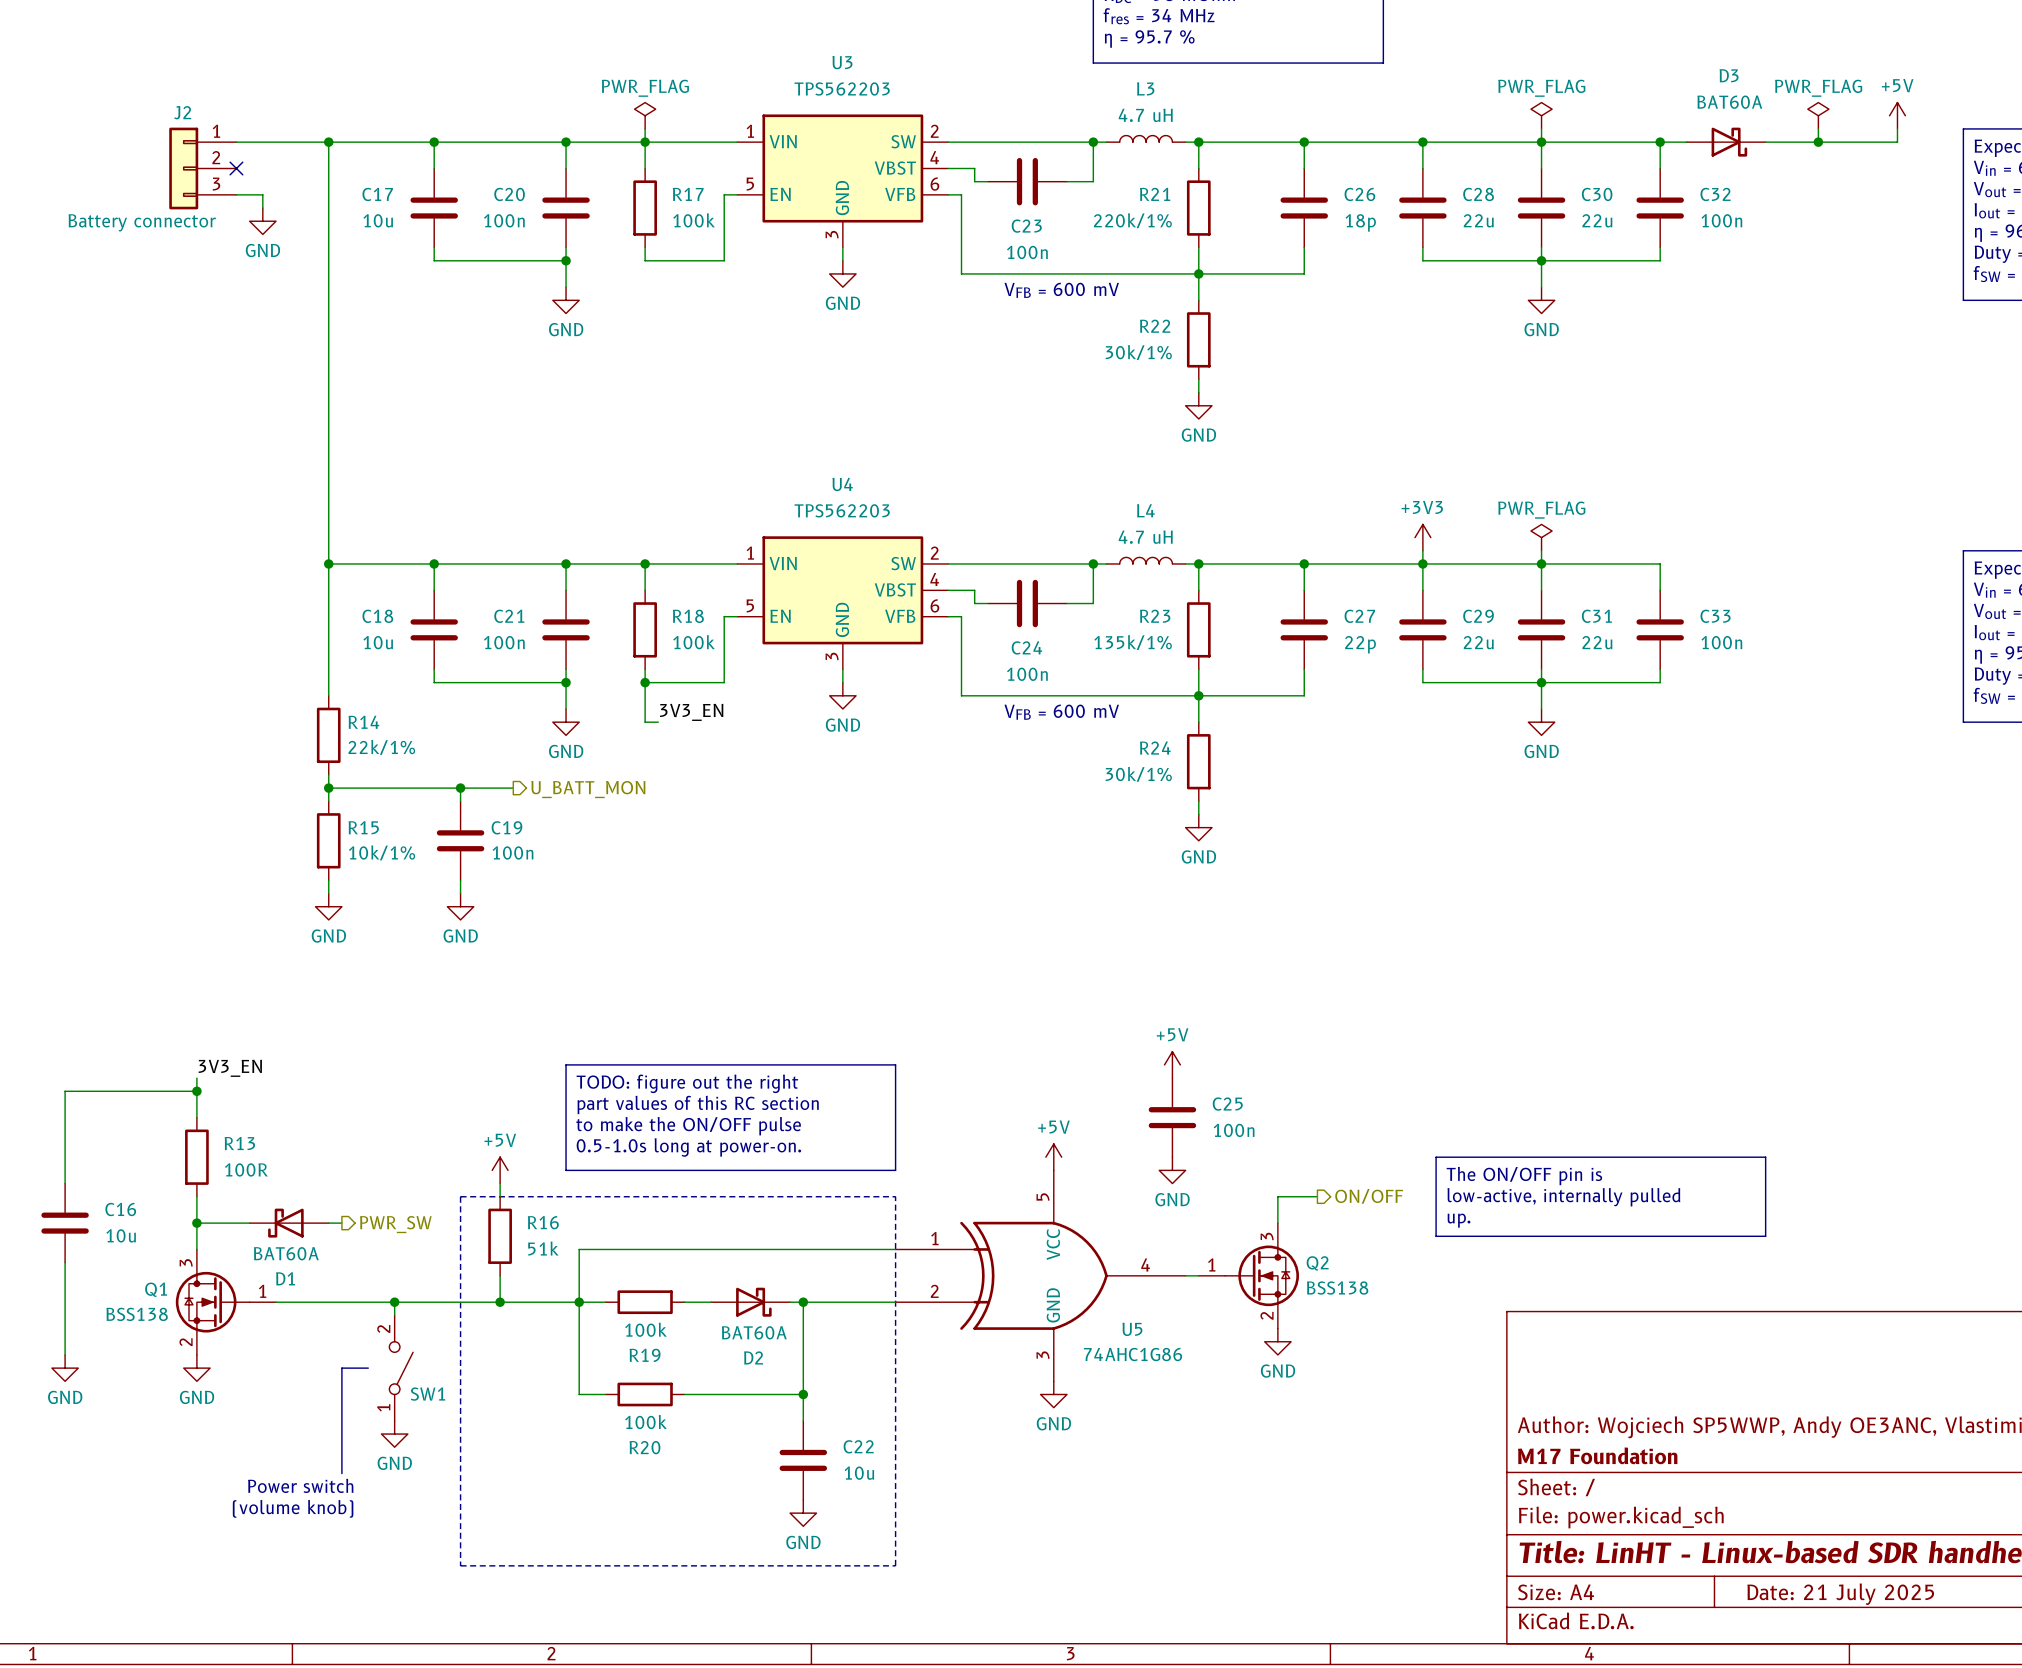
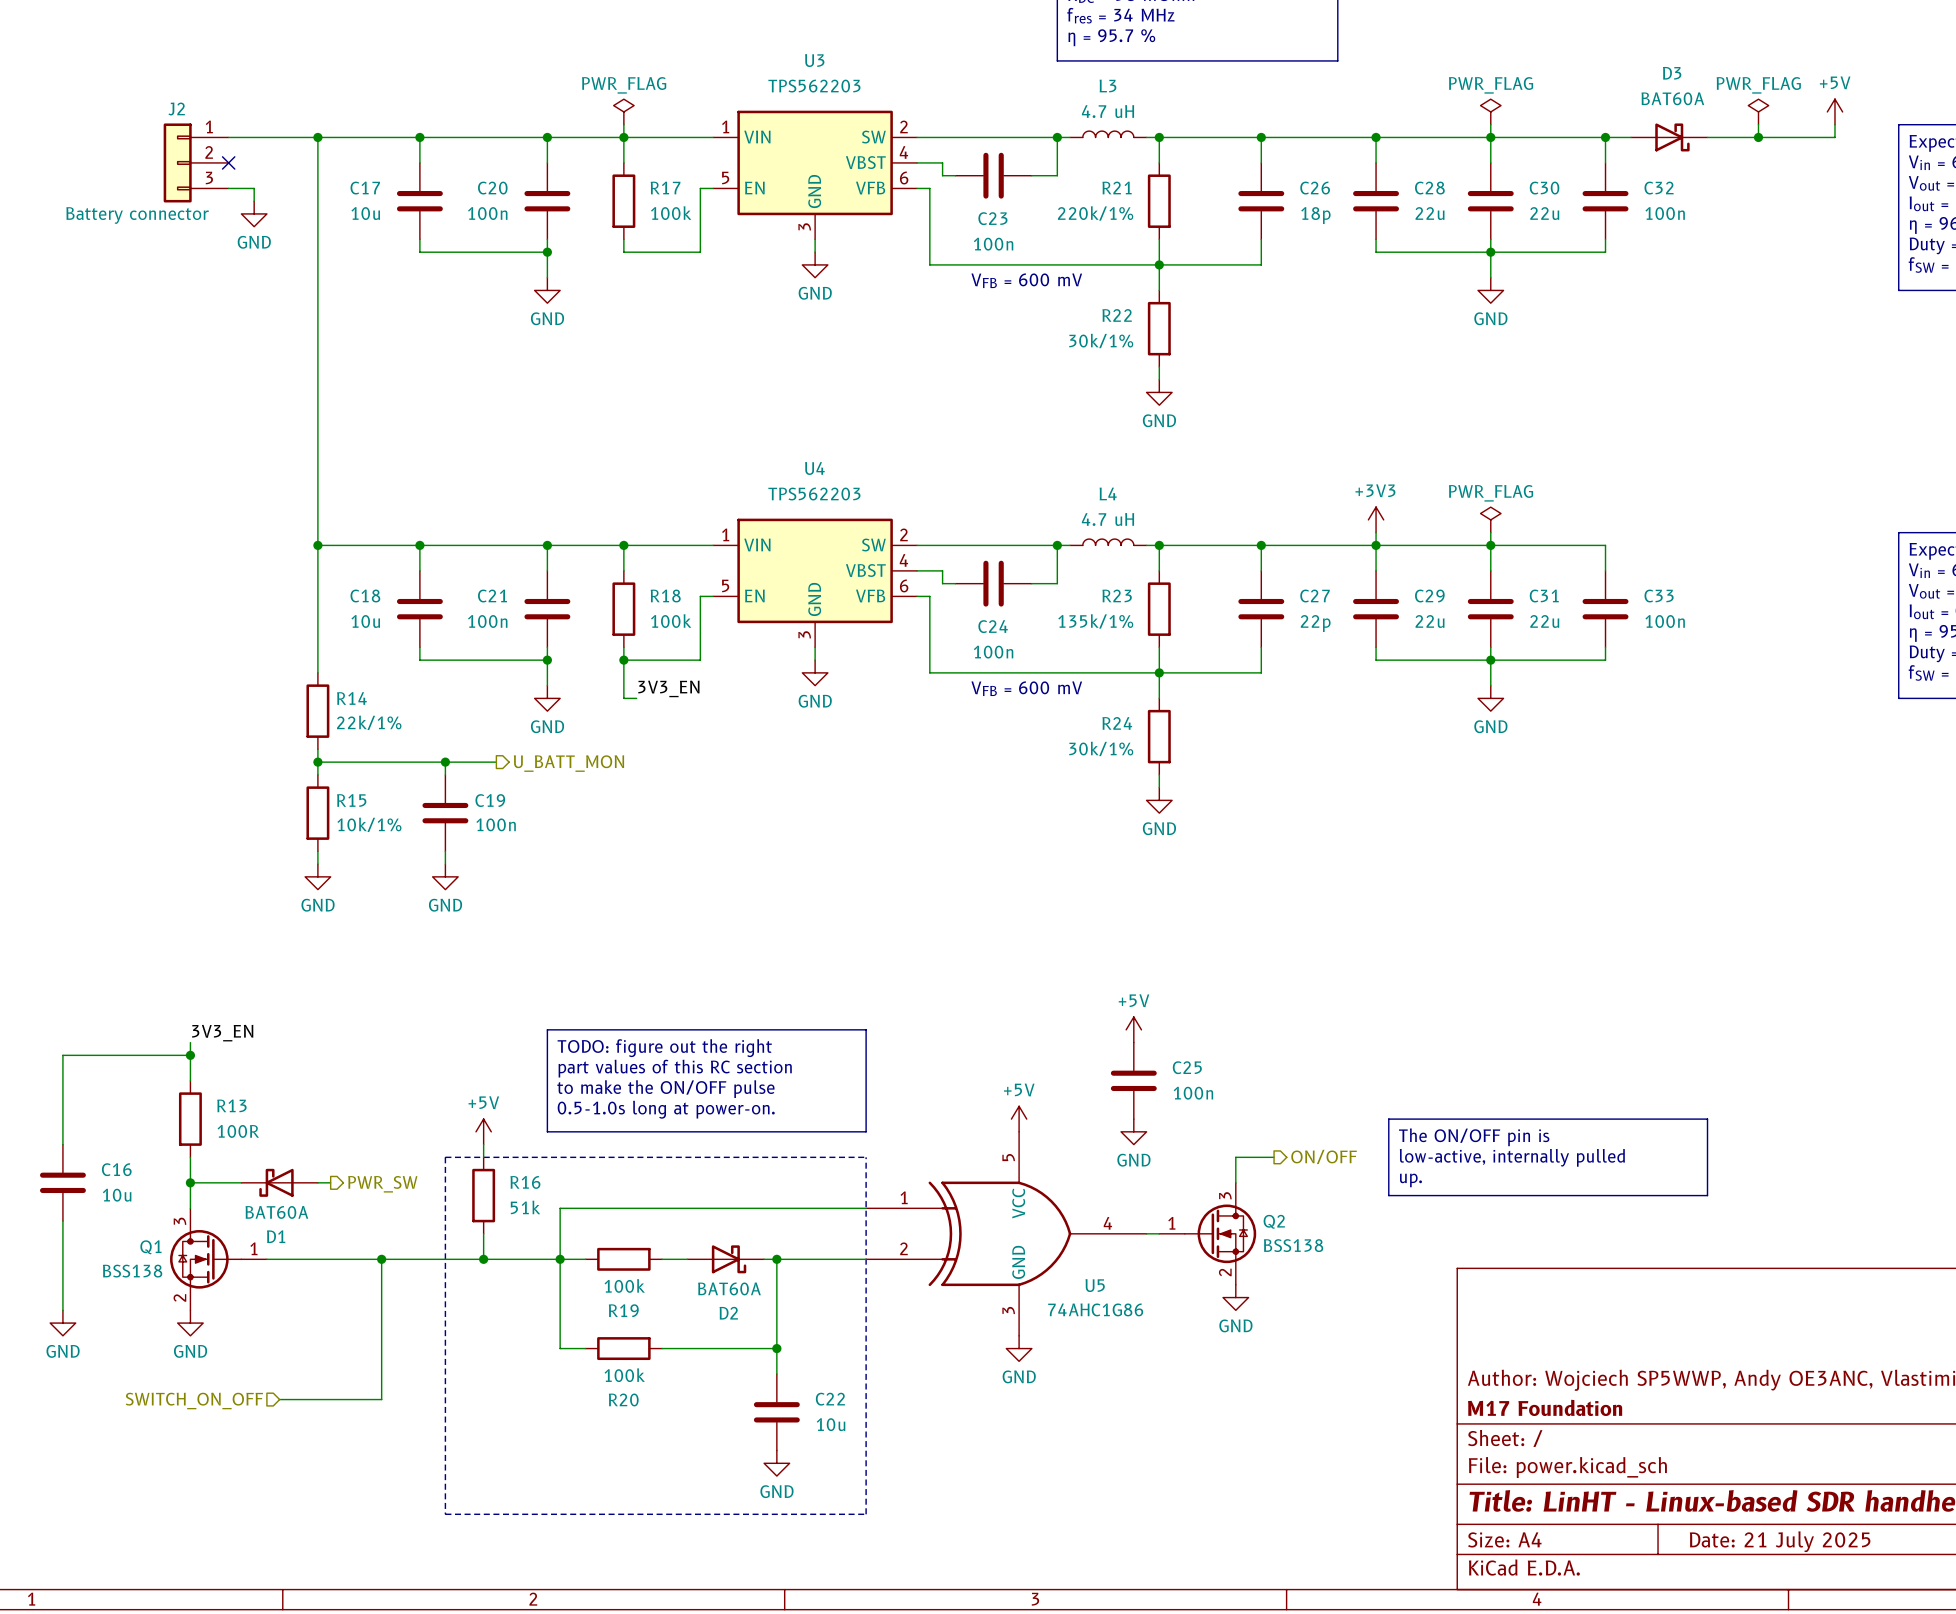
wire: none -> (381, 1272) (381, 1399) (279, 1399)
line: (368, 1368) (341, 1368) (341, 1473) -> none
SW1: (401, 1368) -> none
power symbol: GND (394, 1434) -> none
hierarchical label: none -> SWITCH_ON_OFF (194, 1400)
text: Power switch (300, 1485) -> none
text: (volume knob) (293, 1508) -> none

